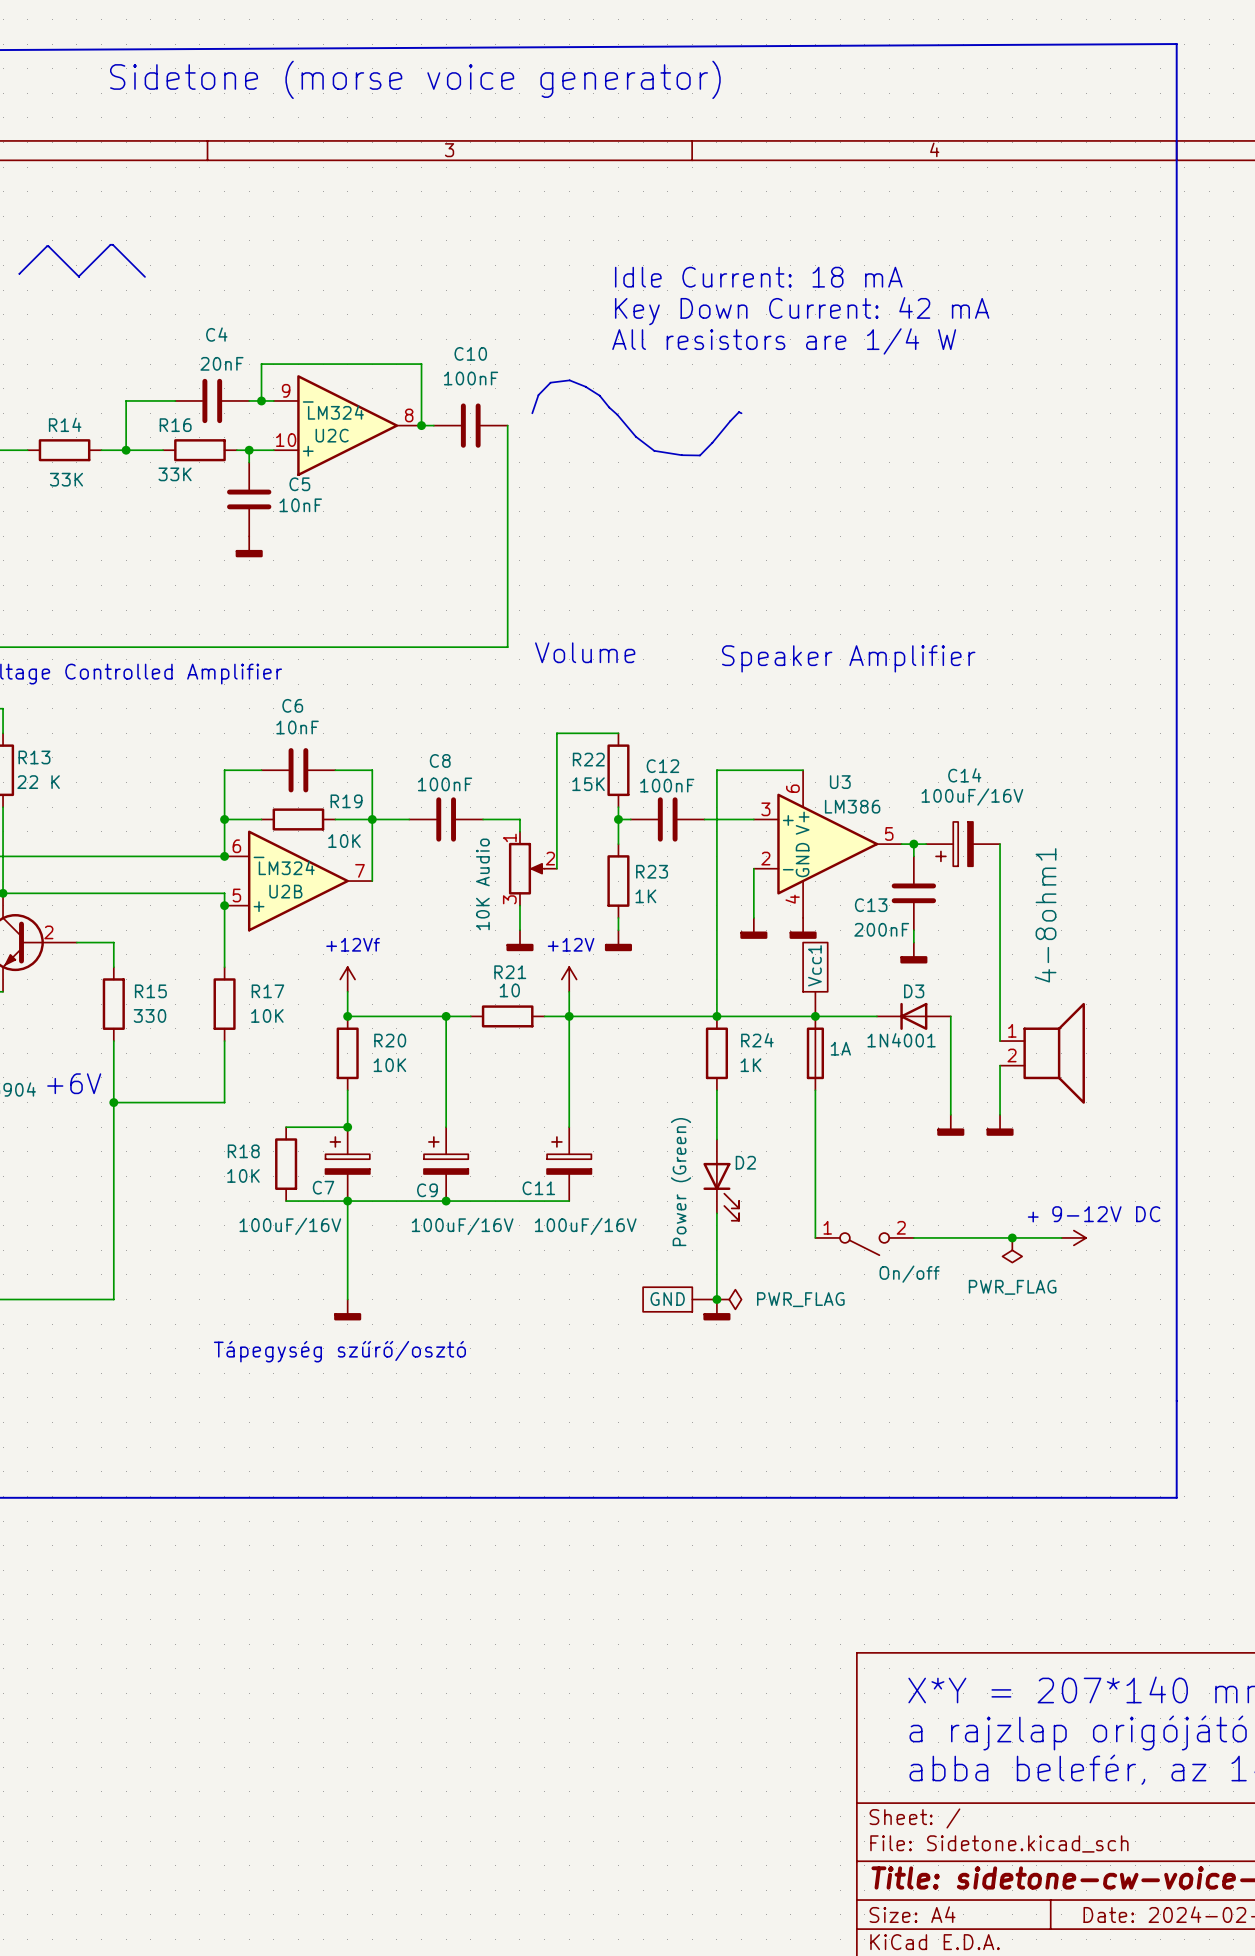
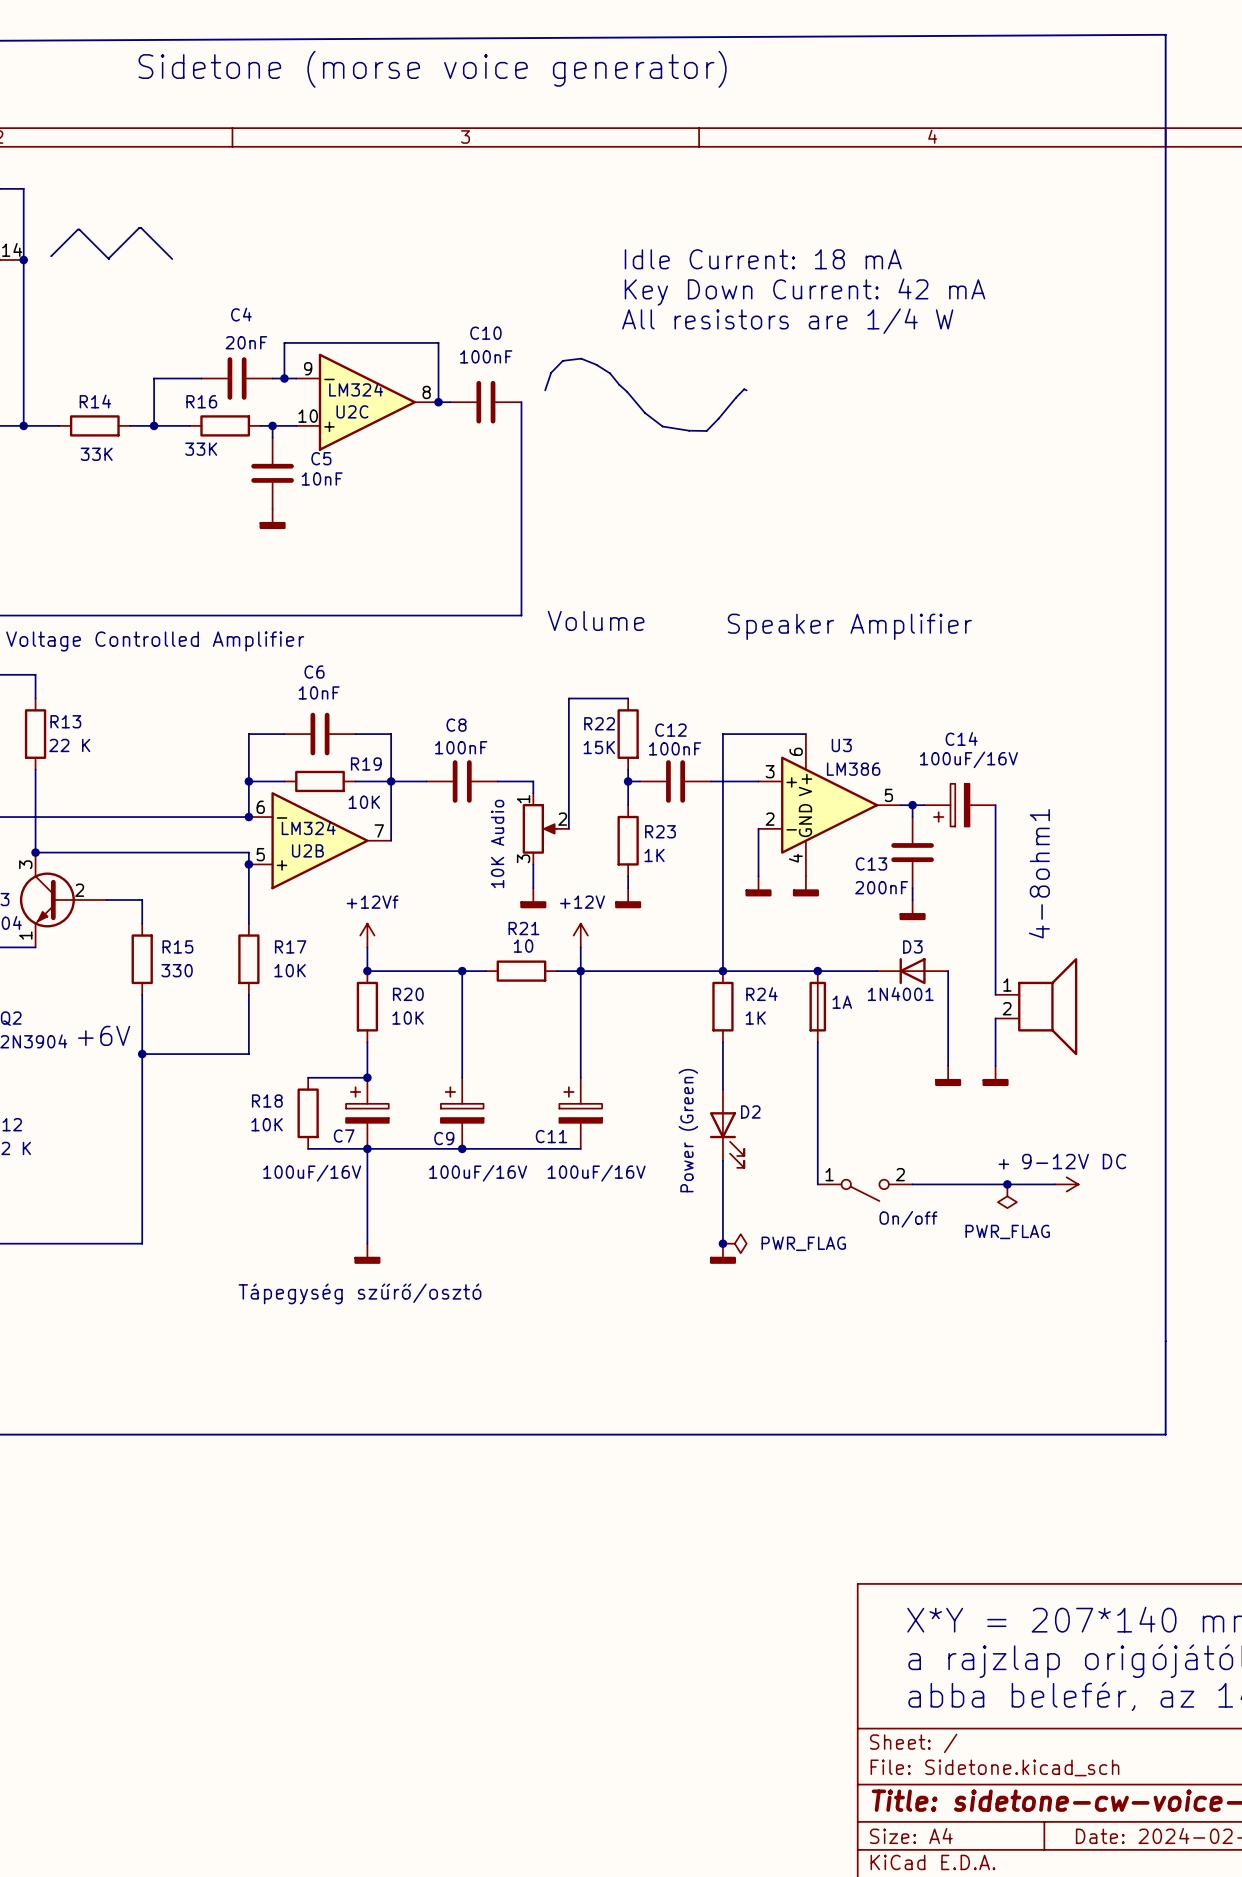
Vcc1: (815, 979) -> none
text: 9-12V DC (1106, 1214) -> none
text: none -> + (1003, 1164)
text: + (1033, 1217) -> 9-12V DC (1074, 1161)
part: (680, 1299) -> none

